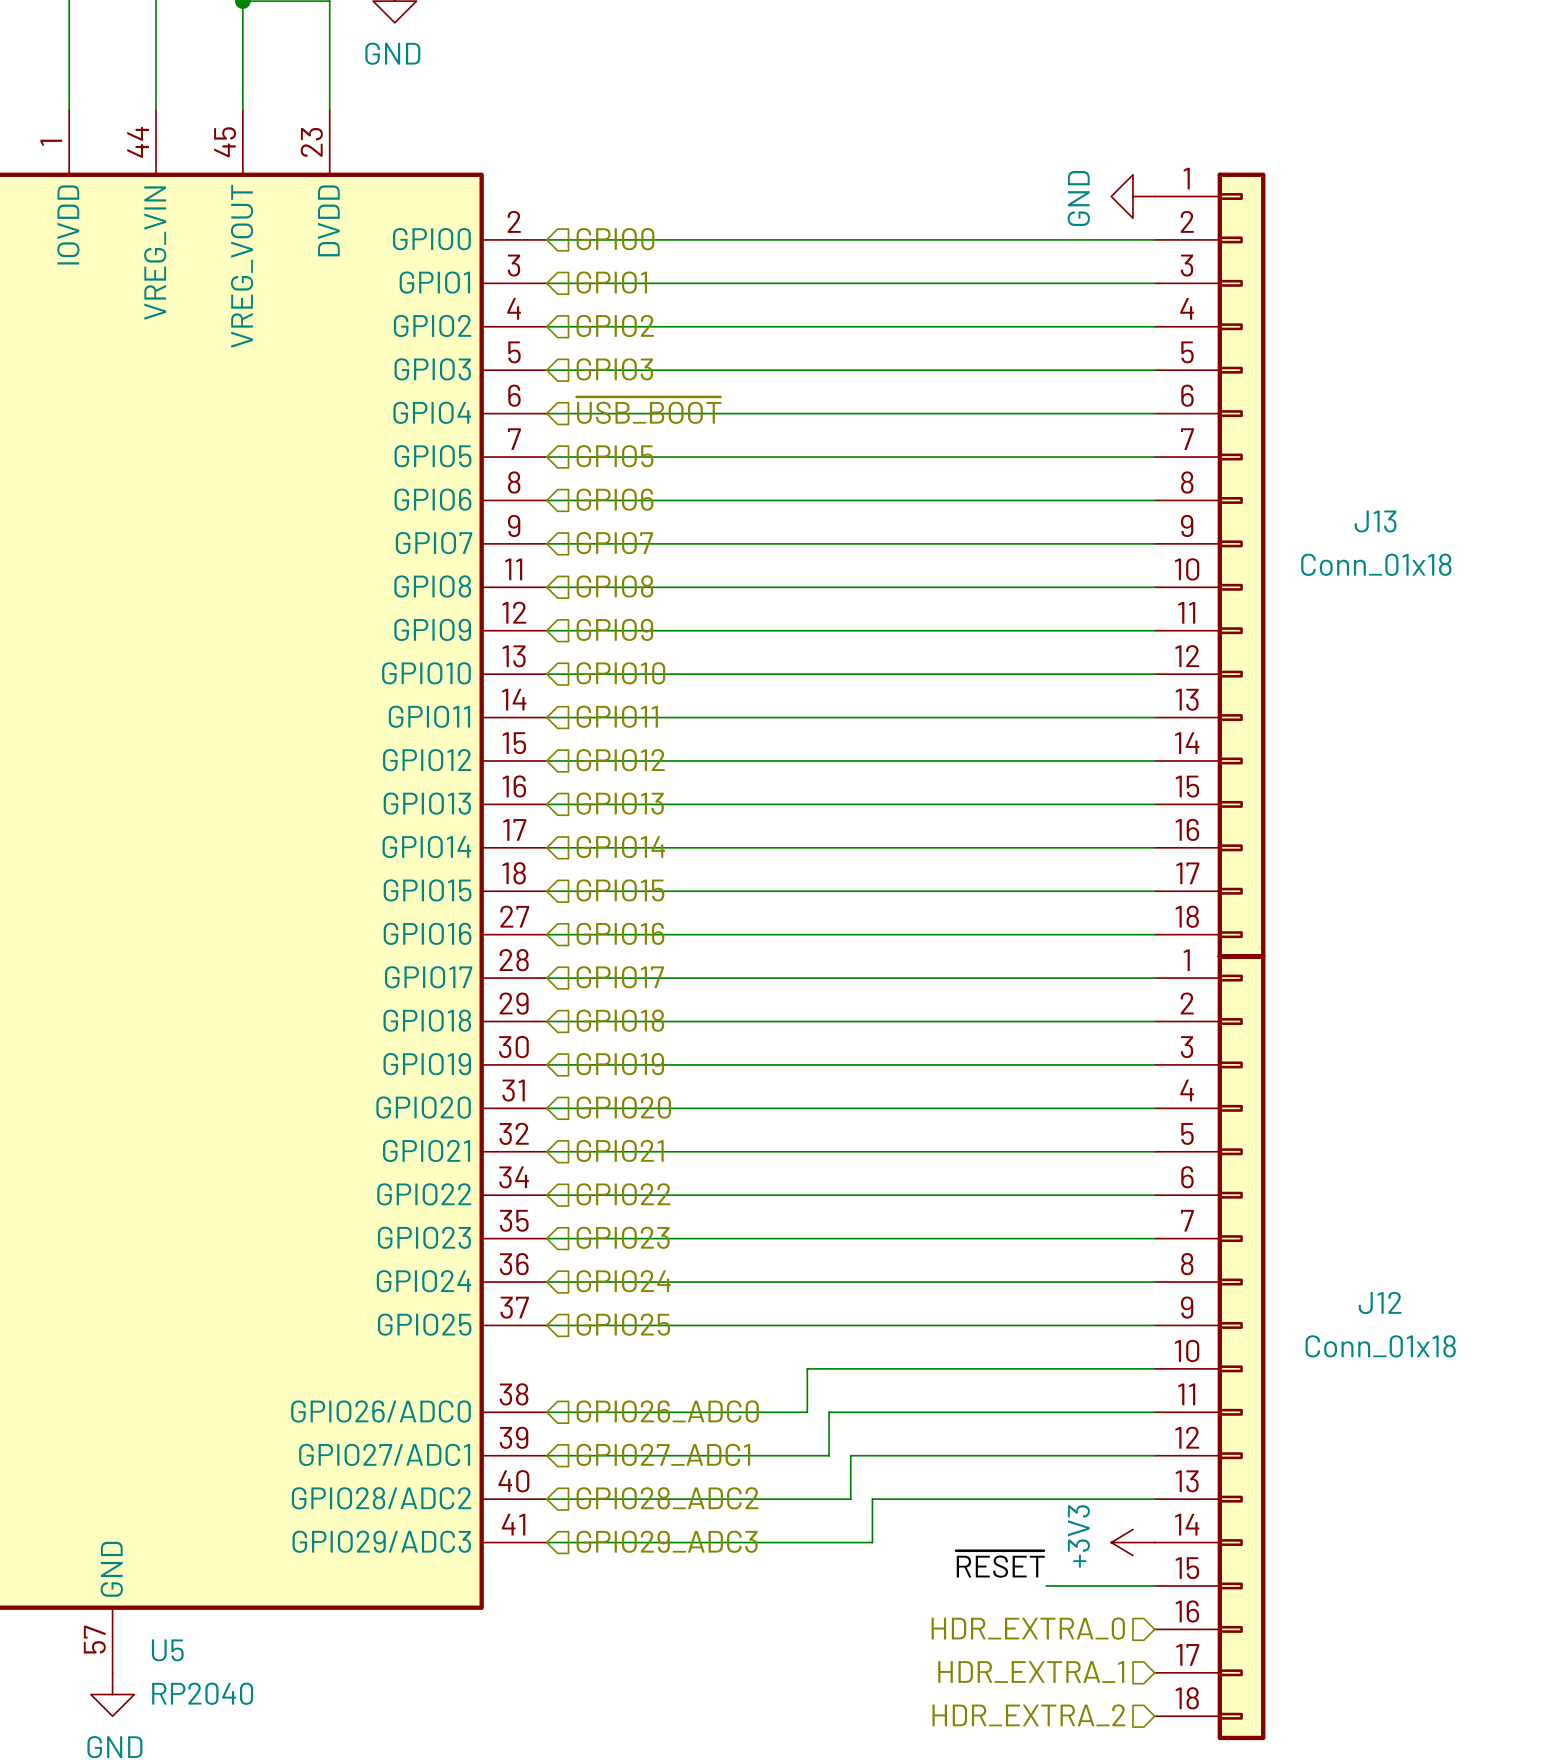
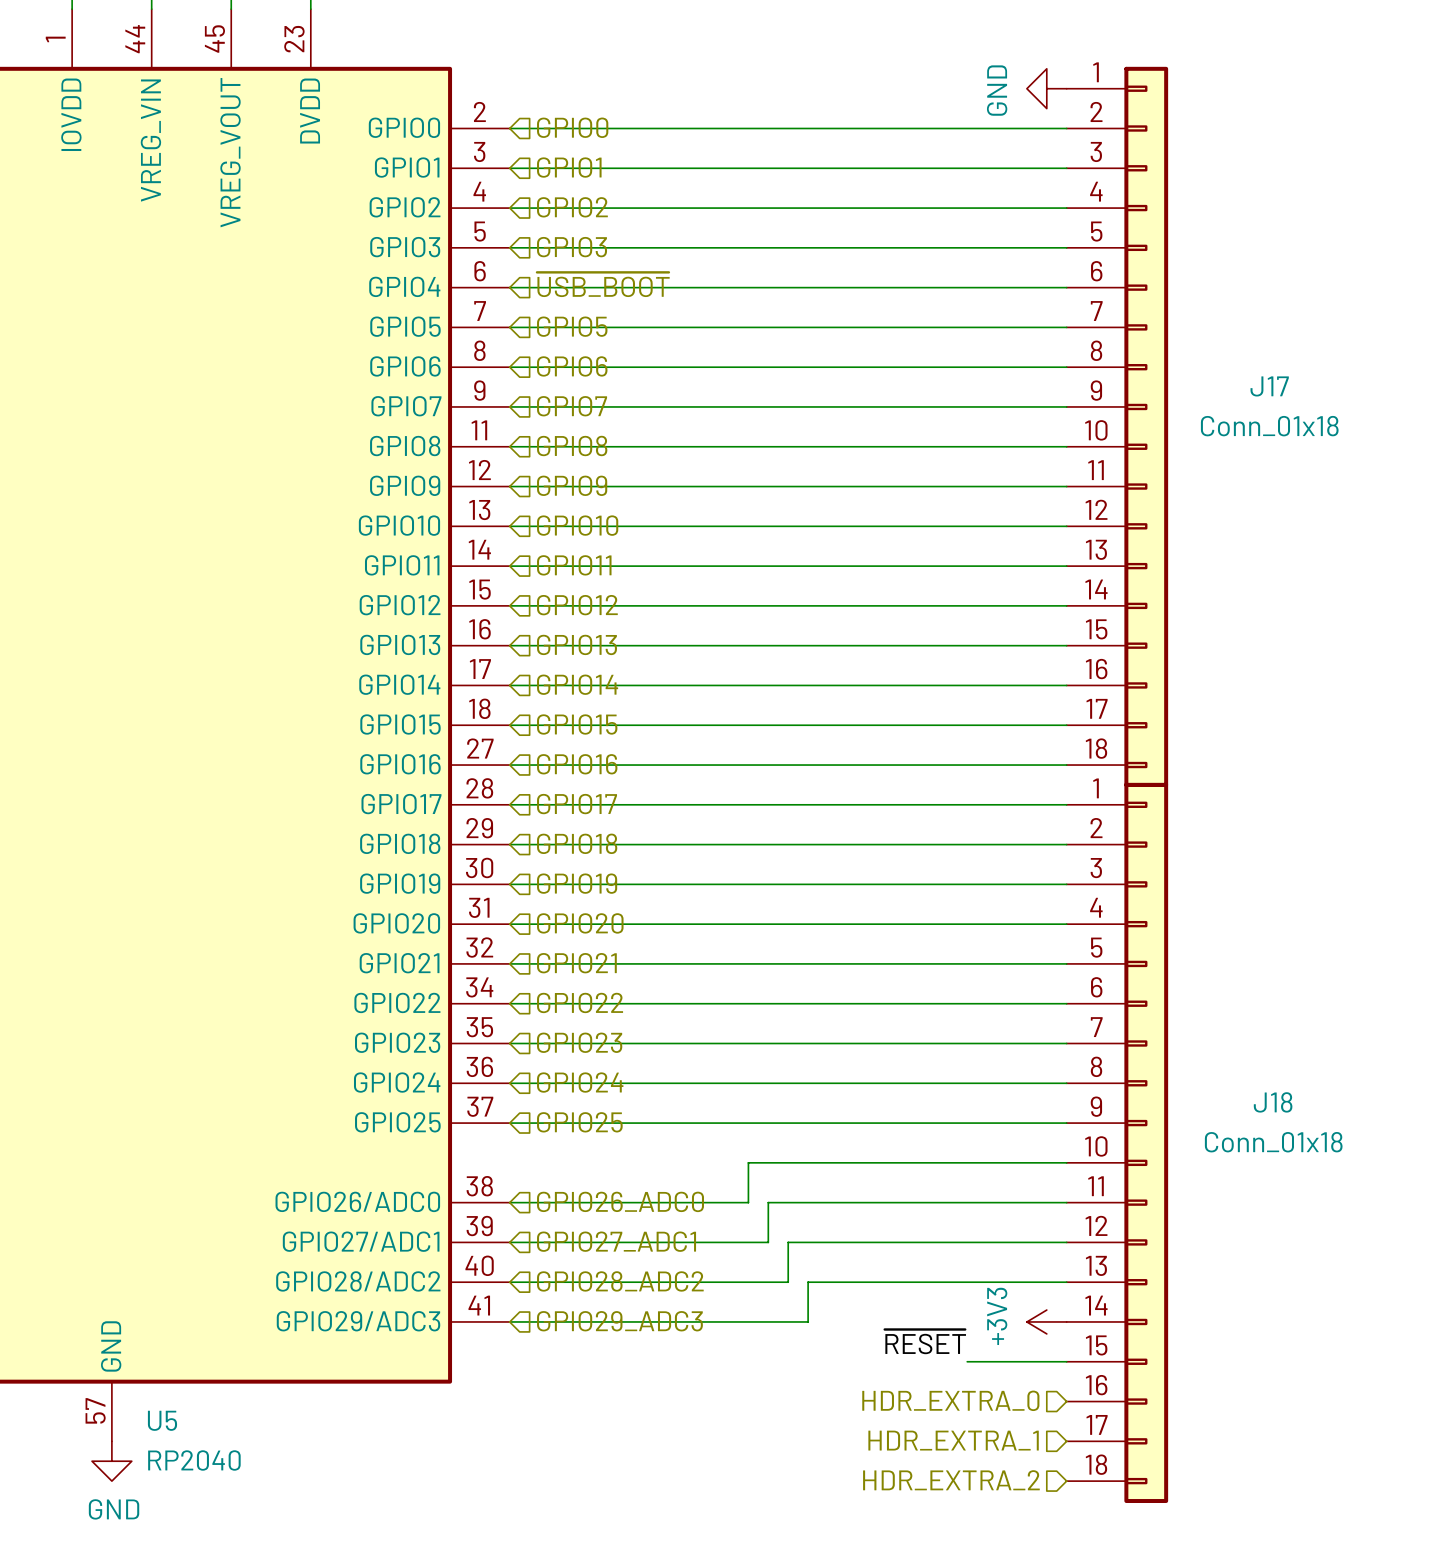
J13 name: J13 (1375, 521) -> J17 (1269, 386)
J12 name: J12 (1380, 1302) -> J18 (1273, 1102)

